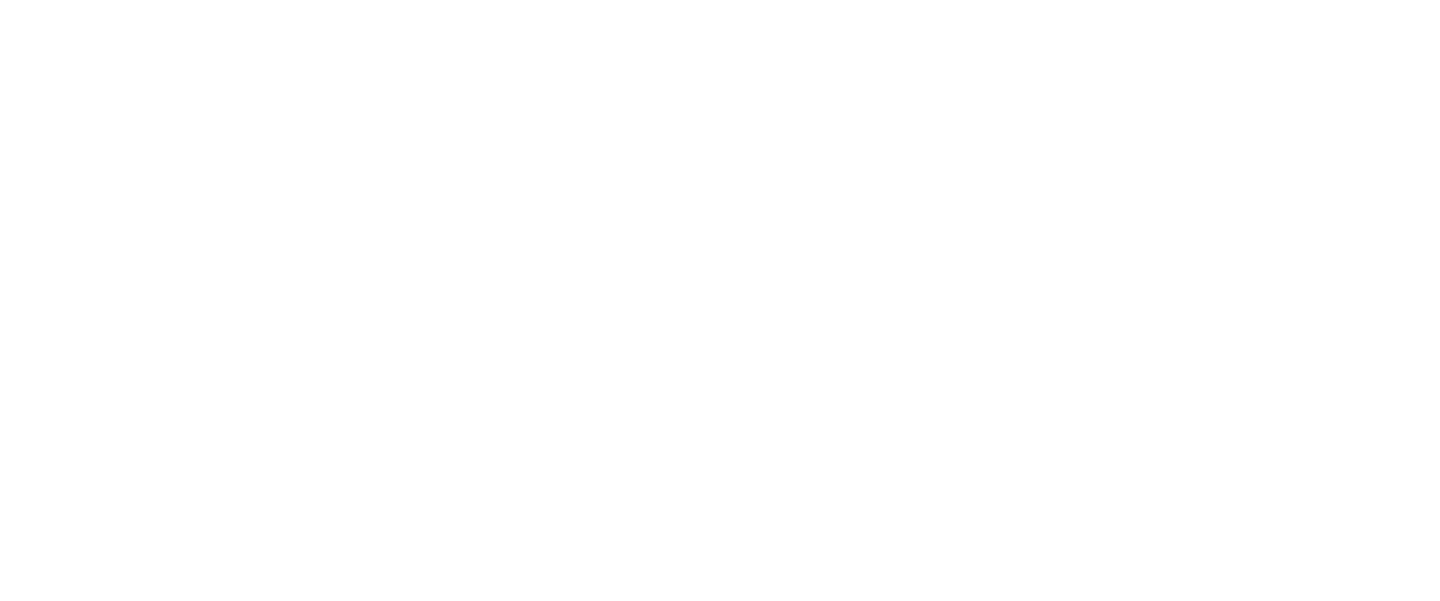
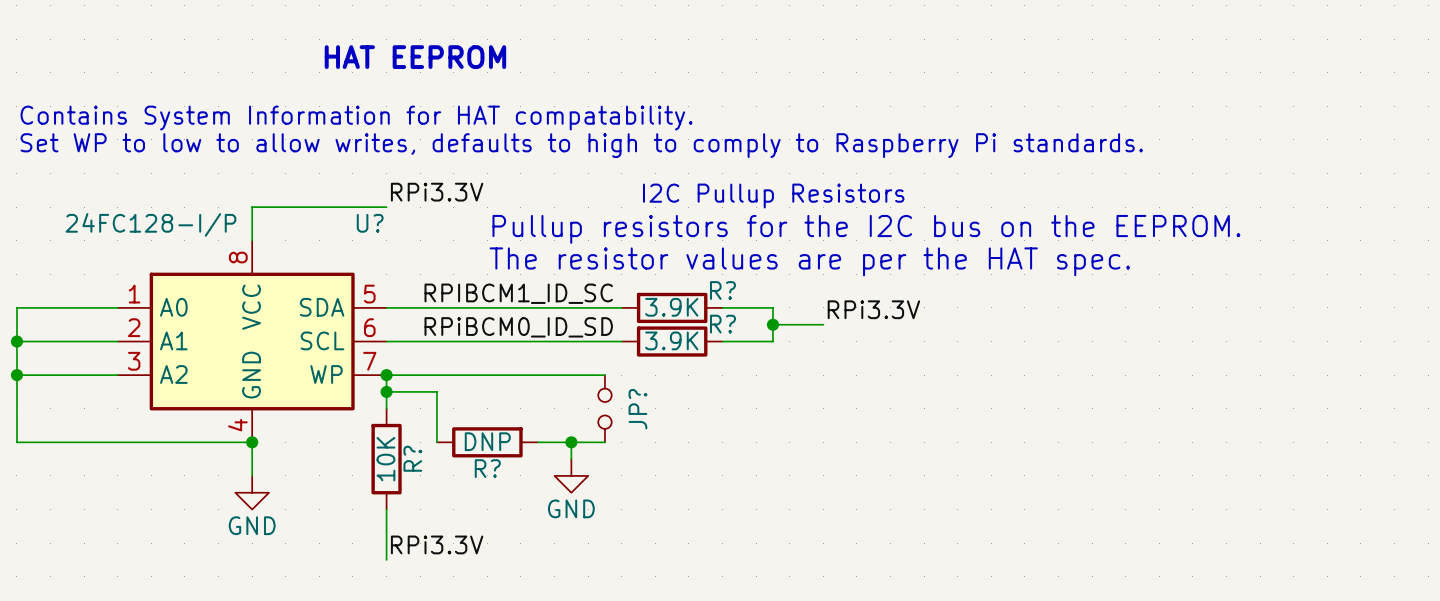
text: none -> HAT EEPROM (415, 57)
text: none -> Contains System Information for HAT compatability. (356, 118)
text: none -> Set WP to low to allow writes, defaults to high to comply to Raspberry Pi standards. (581, 145)
label: none -> RPi3.3V (437, 192)
text: none -> I2C Pullup Resistors (773, 196)
wire: none -> (386, 207) (252, 207) (252, 240)
text: none -> Pullup resistors for the I2C bus on the EEPROM. (866, 229)
text: none -> The resistor values are per the HAT spec. (809, 261)
label: none -> RPIBCM1_ID_SC (518, 293)
wire: none -> (117, 307) (16, 307) (16, 442) (252, 442) (252, 475)
wire: none -> (386, 307) (621, 307)
R?: none -> 3.9K (672, 307)
wire: none -> (722, 307) (772, 307) (772, 341) (722, 341)
label: none -> RPi3.3V (873, 309)
wire: none -> (772, 324) (823, 324)
junction: none -> (772, 324)
label: none -> RPiBCM0_ID_SD (518, 327)
wire: none -> (16, 341) (117, 341)
junction: none -> (16, 341)
U?: none -> 24FC128-I/P (252, 341)
wire: none -> (386, 341) (621, 341)
R?: none -> 3.9K (672, 341)
wire: none -> (16, 375) (117, 375)
junction: none -> (16, 375)
junction: none -> (386, 375)
wire: none -> (604, 375) (386, 375) (386, 408)
wire: none -> (386, 391) (436, 391) (436, 442)
junction: none -> (386, 391)
JP?: none -> (604, 408)
junction: none -> (252, 442)
R?: none -> DNP (487, 442)
wire: none -> (537, 442) (604, 442)
wire: none -> (571, 442) (571, 459)
junction: none -> (571, 442)
R?: none -> 10K (386, 459)
power symbol: none -> GND (571, 475)
power symbol: none -> GND (252, 492)
wire: none -> (386, 509) (386, 559)
label: none -> RPi3.3V (437, 544)

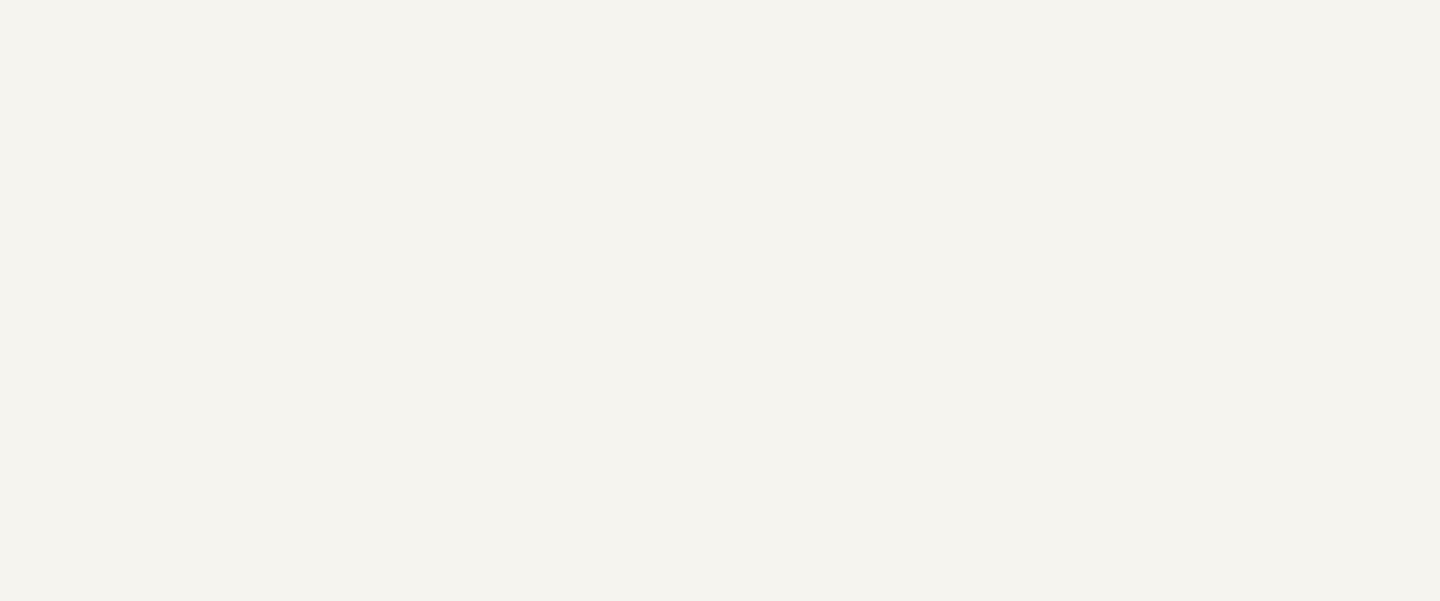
text: HAT EEPROM (415, 57) -> none
text: Contains System Information for HAT compatability. (356, 118) -> none
text: Set WP to low to allow writes, defaults to high to comply to Raspberry Pi standards. (581, 145) -> none
label: RPi3.3V (437, 192) -> none
text: I2C Pullup Resistors (773, 196) -> none
wire: (386, 207) (252, 207) (252, 240) -> none
text: Pullup resistors for the I2C bus on the EEPROM. (866, 229) -> none
text: The resistor values are per the HAT spec. (809, 261) -> none
label: RPIBCM1_ID_SC (518, 293) -> none
wire: (117, 307) (16, 307) (16, 442) (252, 442) (252, 475) -> none
wire: (386, 307) (621, 307) -> none
R?: 3.9K (672, 307) -> none
wire: (722, 307) (772, 307) (772, 341) (722, 341) -> none
label: RPi3.3V (873, 309) -> none
wire: (772, 324) (823, 324) -> none
junction: (772, 324) -> none
label: RPiBCM0_ID_SD (518, 327) -> none
wire: (16, 341) (117, 341) -> none
junction: (16, 341) -> none
U?: 24FC128-I/P (252, 341) -> none
wire: (386, 341) (621, 341) -> none
R?: 3.9K (672, 341) -> none
wire: (16, 375) (117, 375) -> none
junction: (16, 375) -> none
junction: (386, 375) -> none
wire: (604, 375) (386, 375) (386, 408) -> none
wire: (386, 391) (436, 391) (436, 442) -> none
junction: (386, 391) -> none
JP?: (604, 408) -> none
junction: (252, 442) -> none
R?: DNP (487, 442) -> none
wire: (537, 442) (604, 442) -> none
wire: (571, 442) (571, 459) -> none
junction: (571, 442) -> none
R?: 10K (386, 459) -> none
power symbol: GND (571, 475) -> none
power symbol: GND (252, 492) -> none
wire: (386, 509) (386, 559) -> none
label: RPi3.3V (437, 544) -> none

